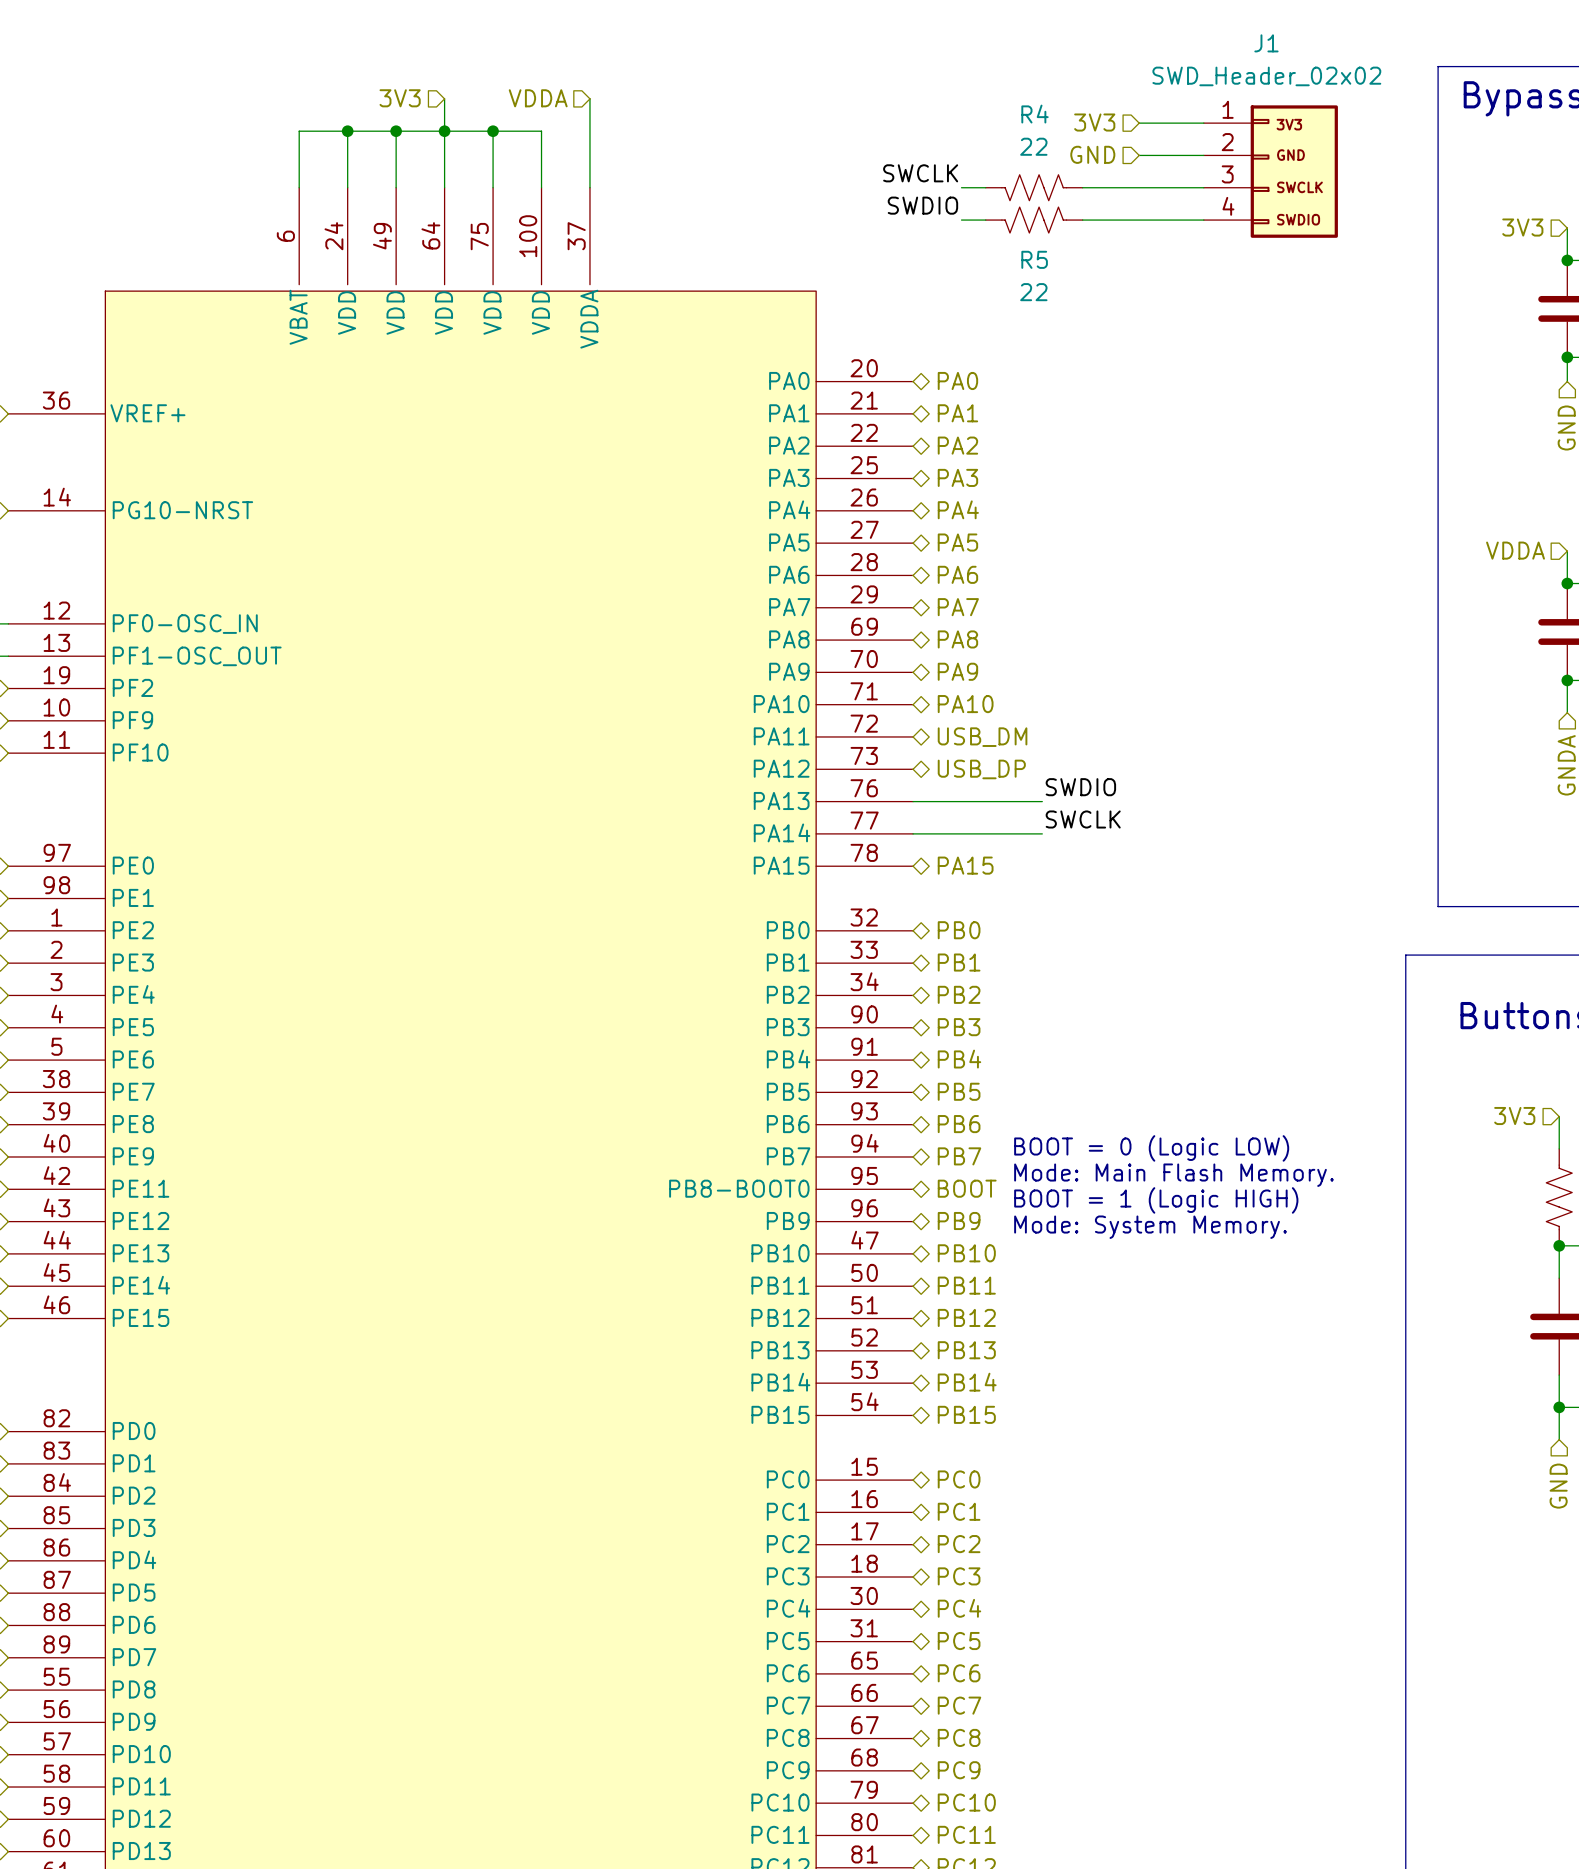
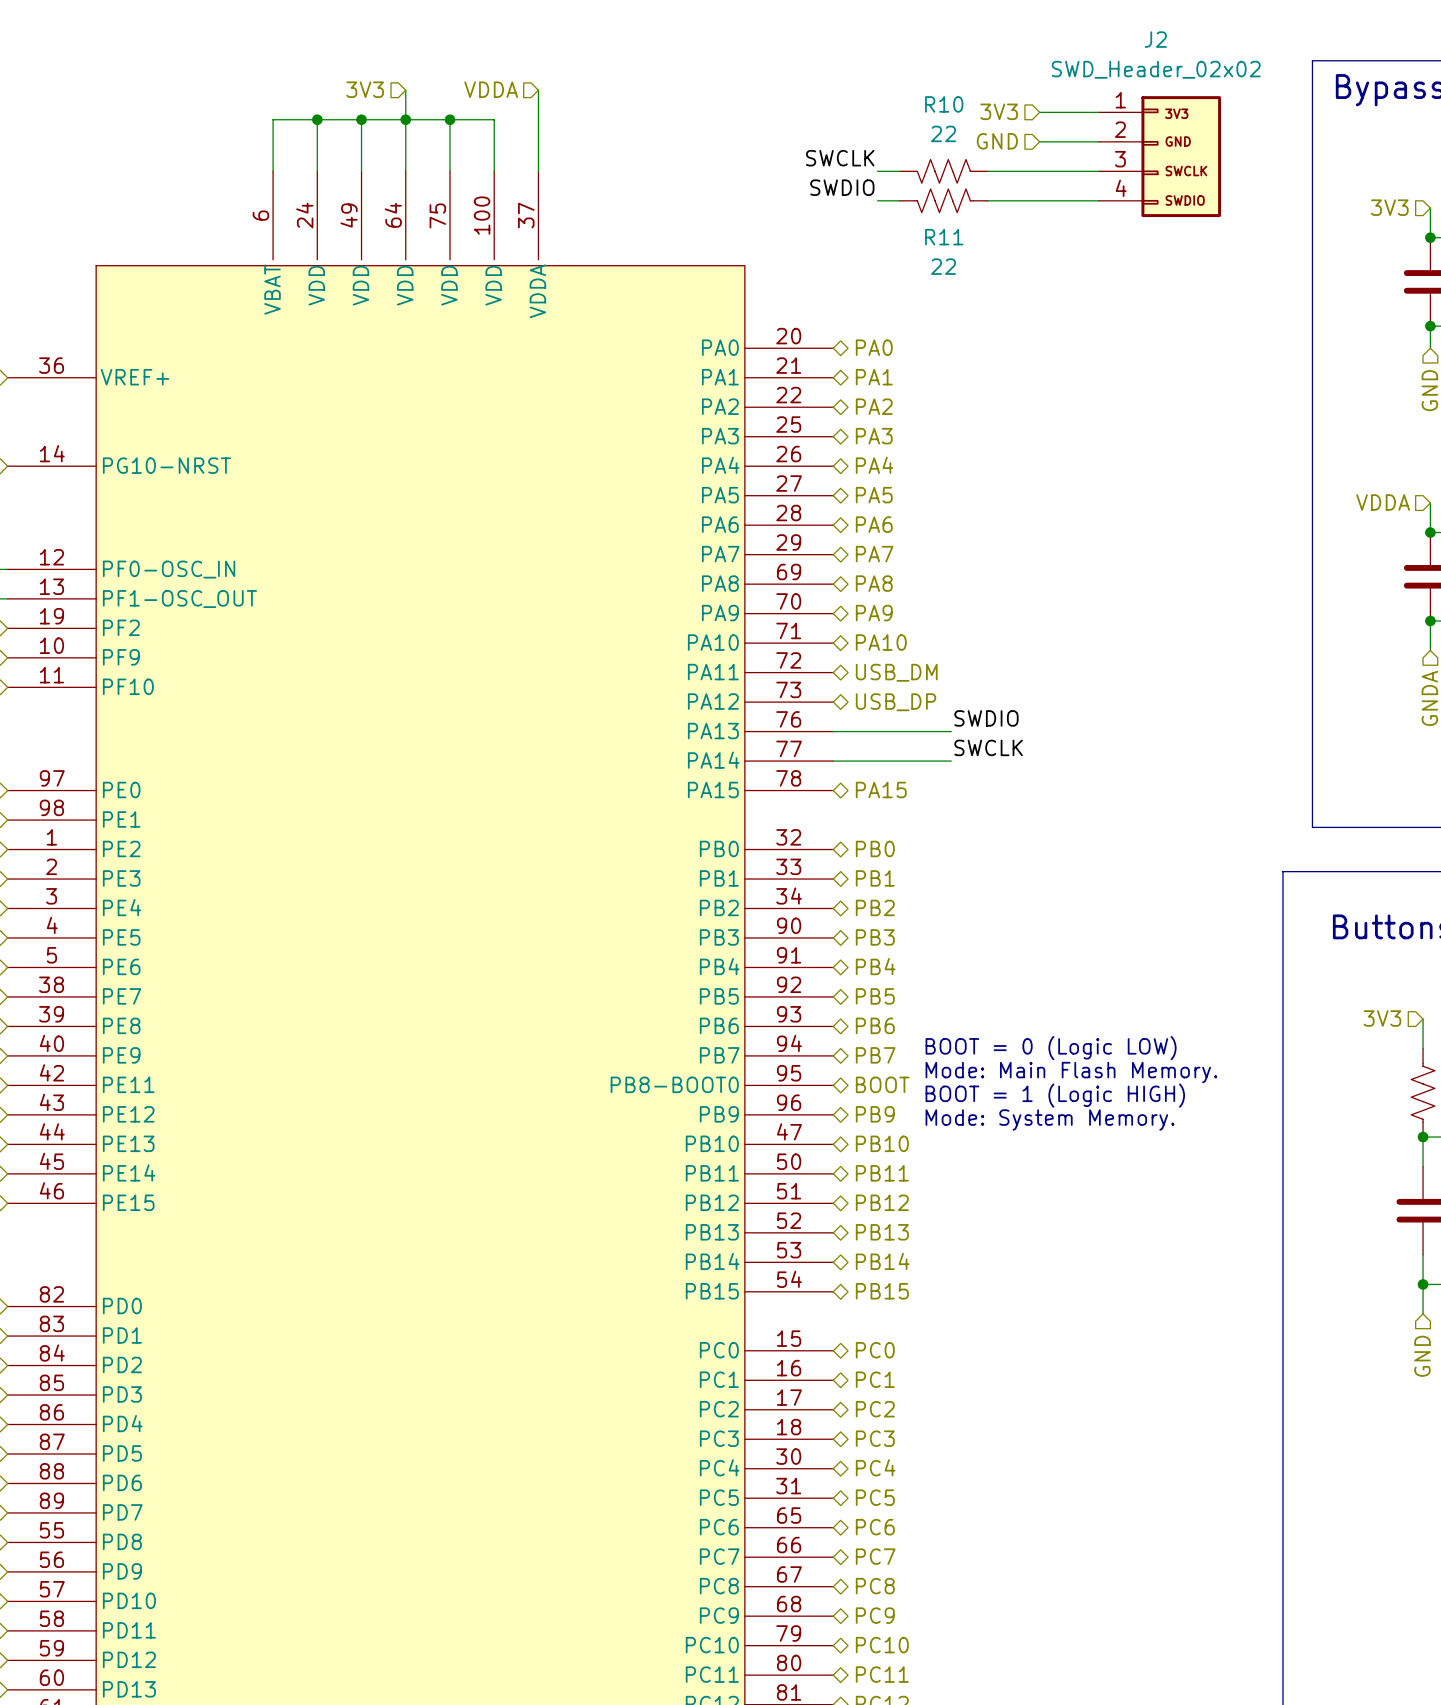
J1 name: J1 (1266, 43) -> J2 (1155, 39)
R4 name: R4 (1034, 114) -> R10 (944, 104)
R5 name: R5 (1034, 259) -> R11 (944, 237)

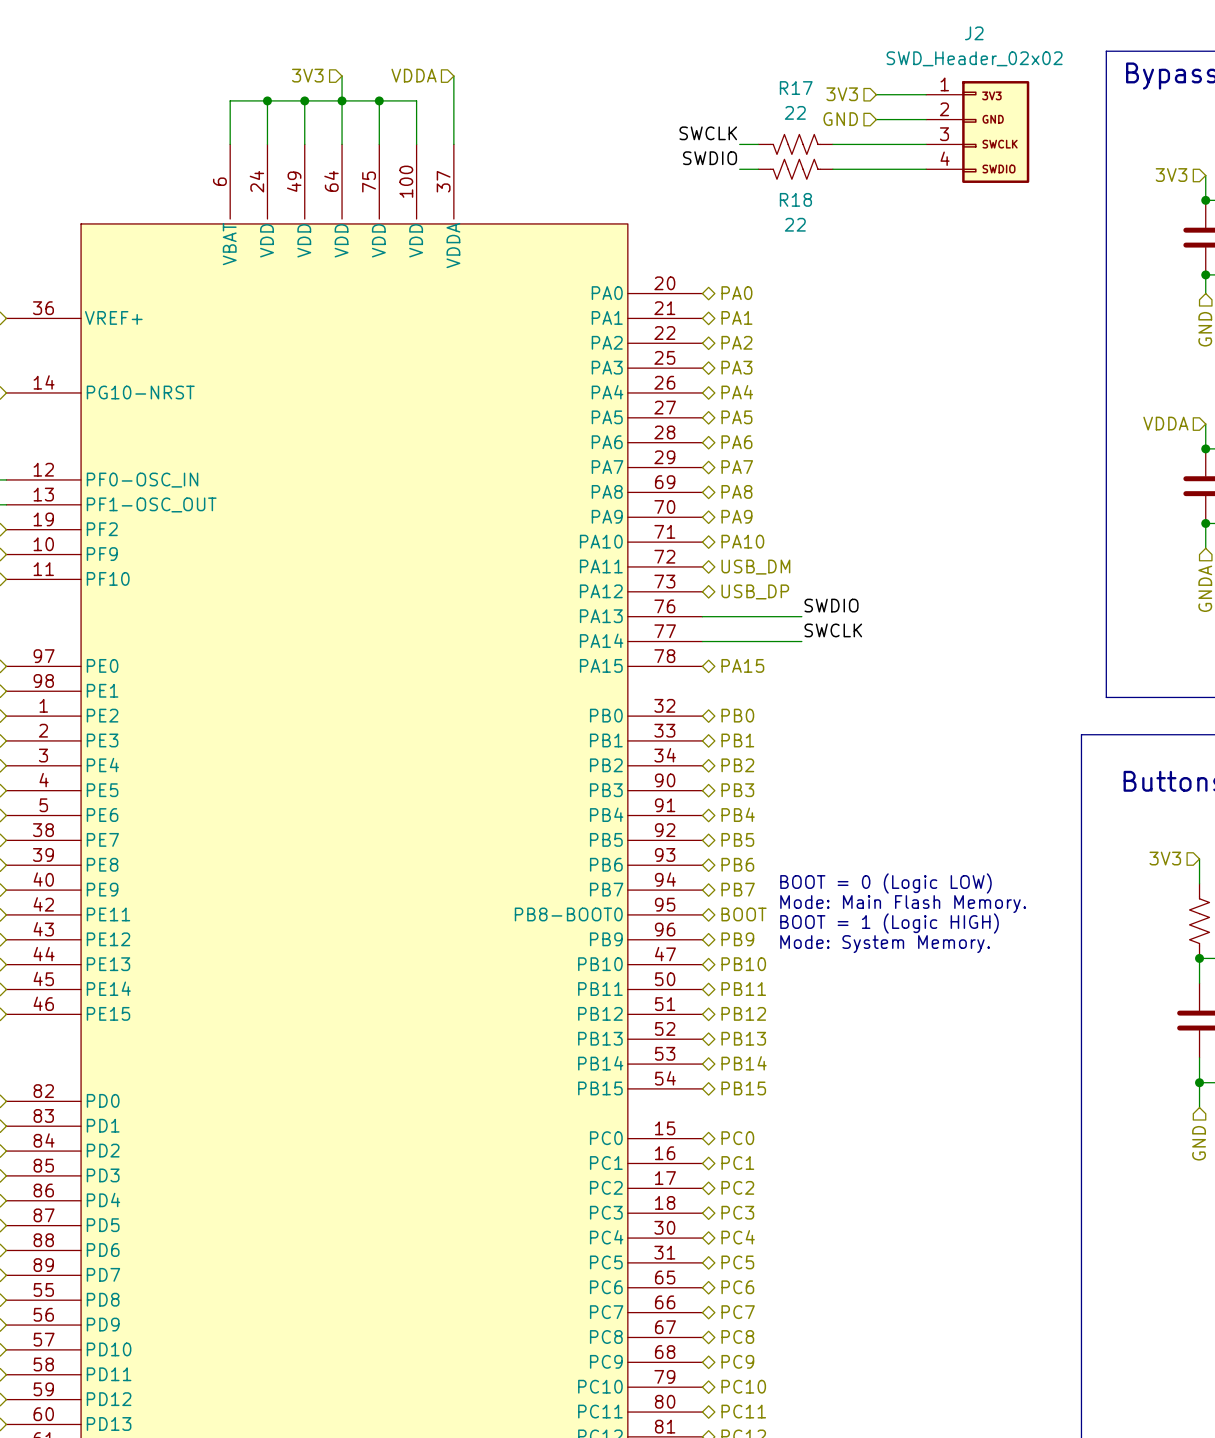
R10 name: R10 (944, 104) -> R17 (796, 88)
R11 name: R11 (944, 237) -> R18 (795, 199)

